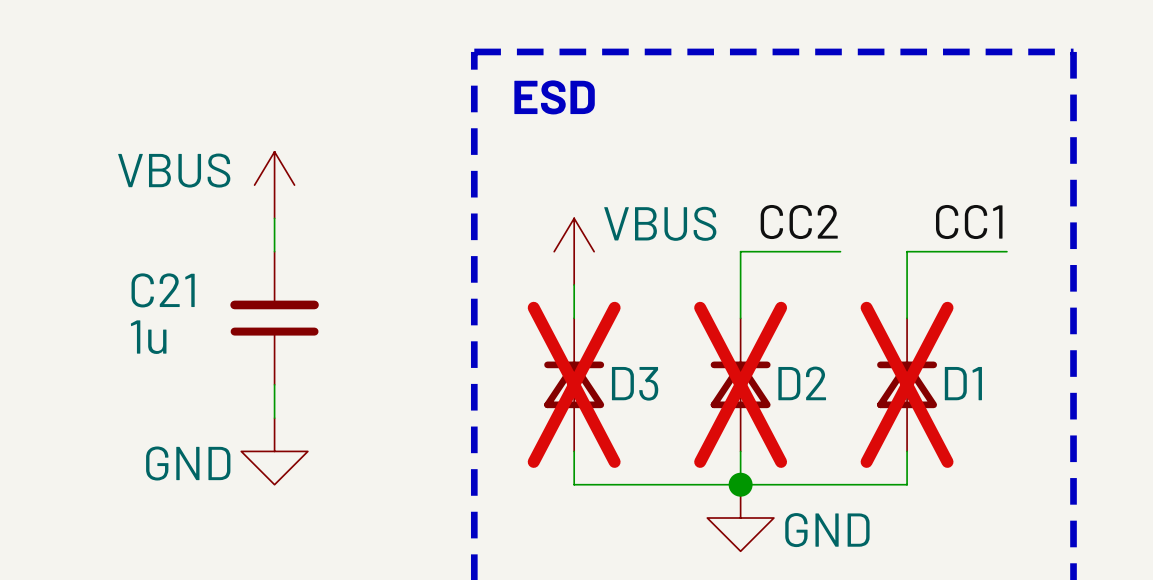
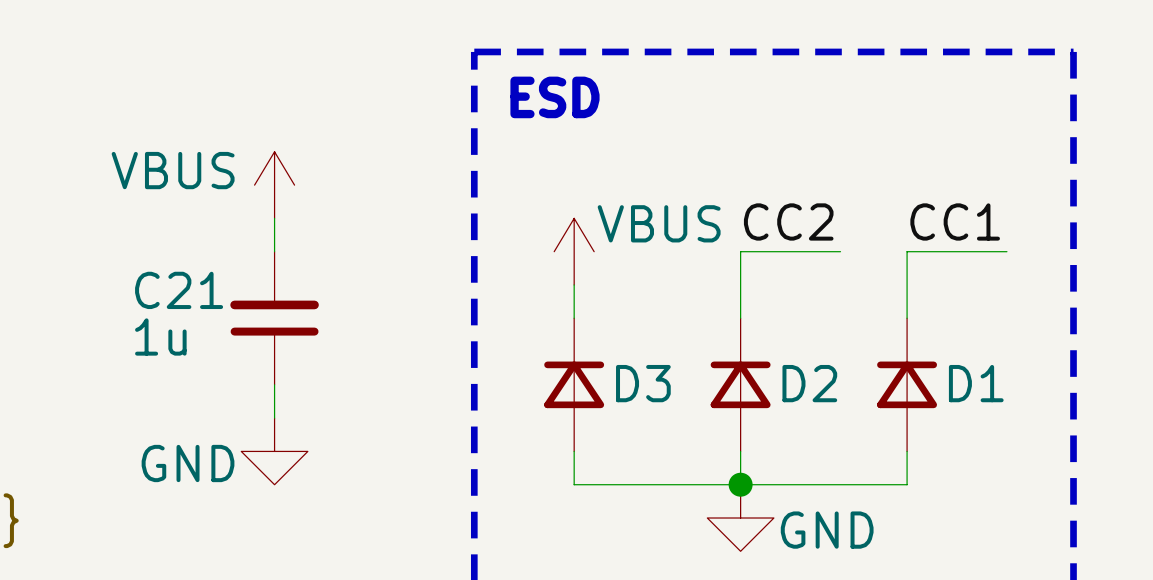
D3 do-not-place cross: (574, 384) -> none
D2 do-not-place cross: (740, 384) -> none
D1 do-not-place cross: (907, 384) -> none

